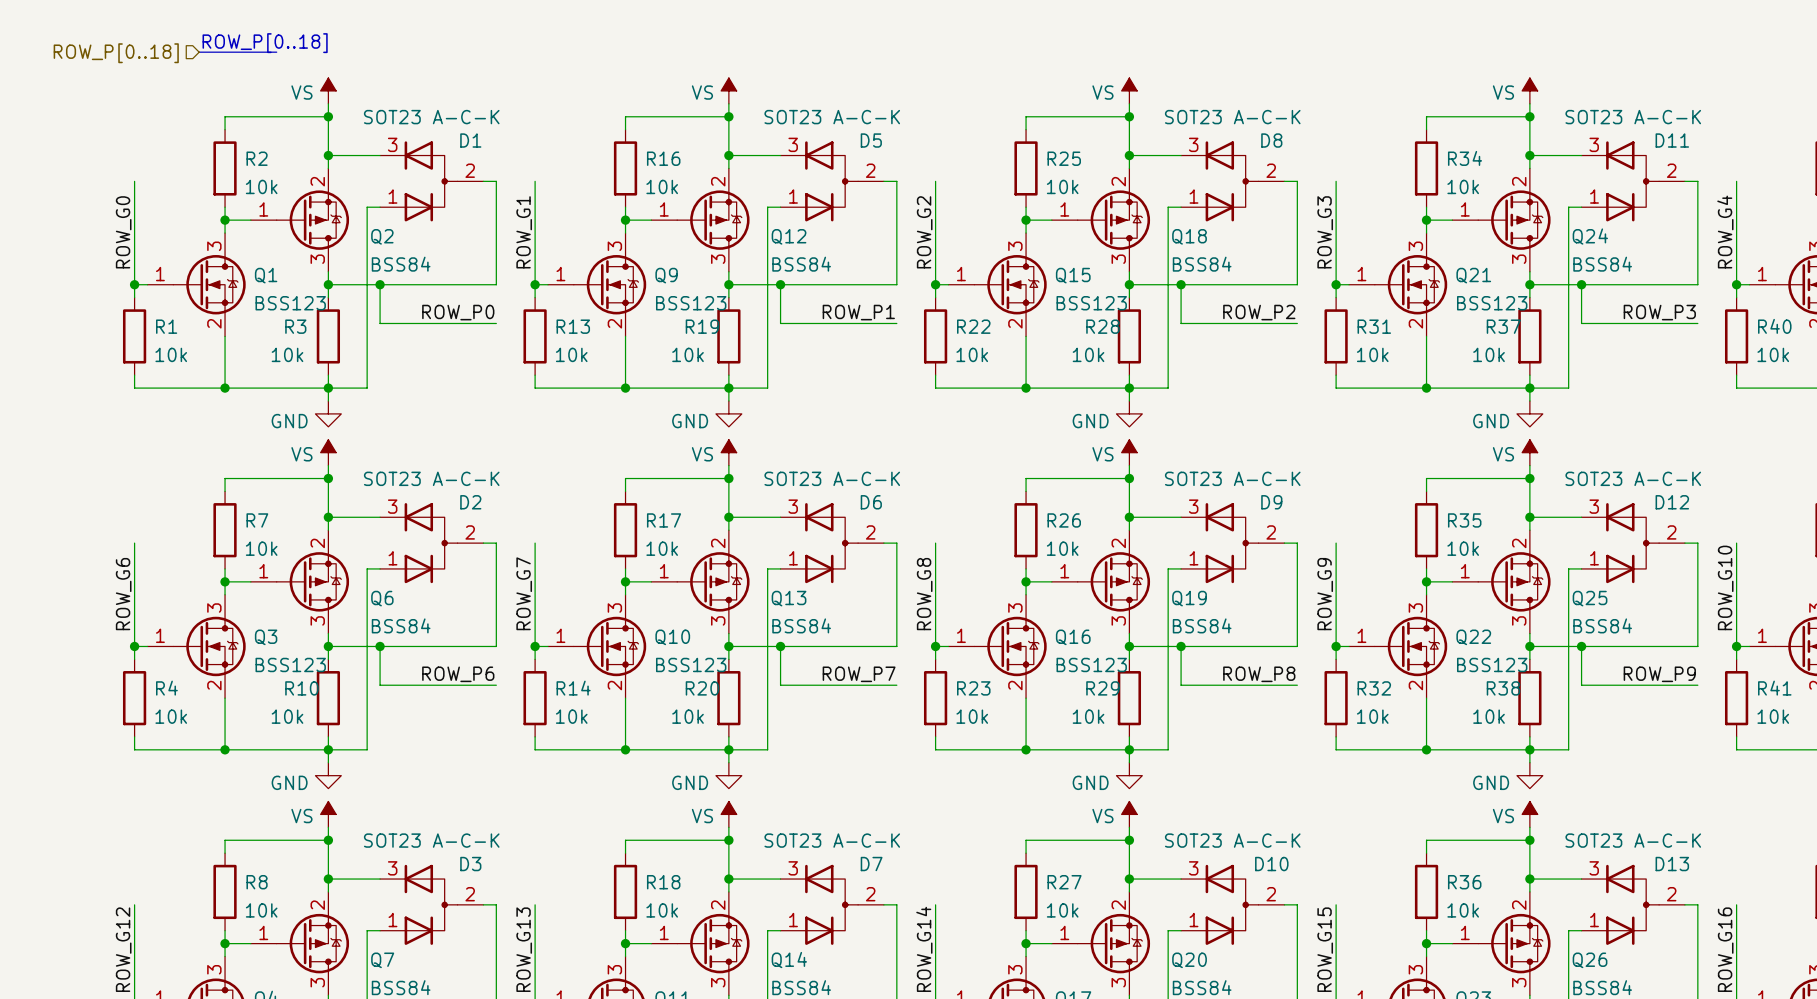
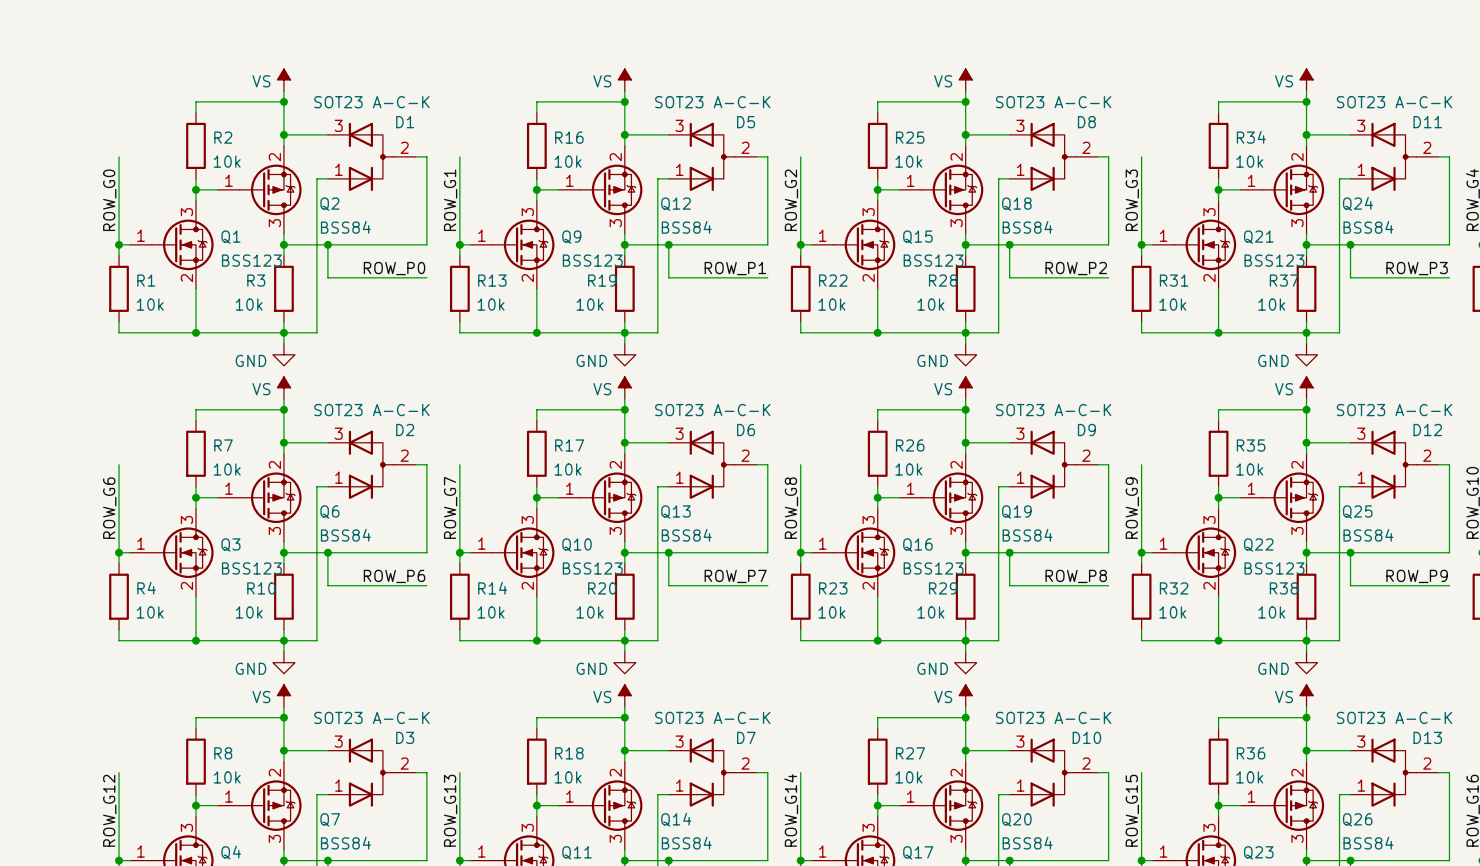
text: ROW_P[0..18] (265, 43) -> none
bus: (199, 52) (276, 52) -> none
hierarchical label: ROW_P[0..18] (116, 53) -> none

